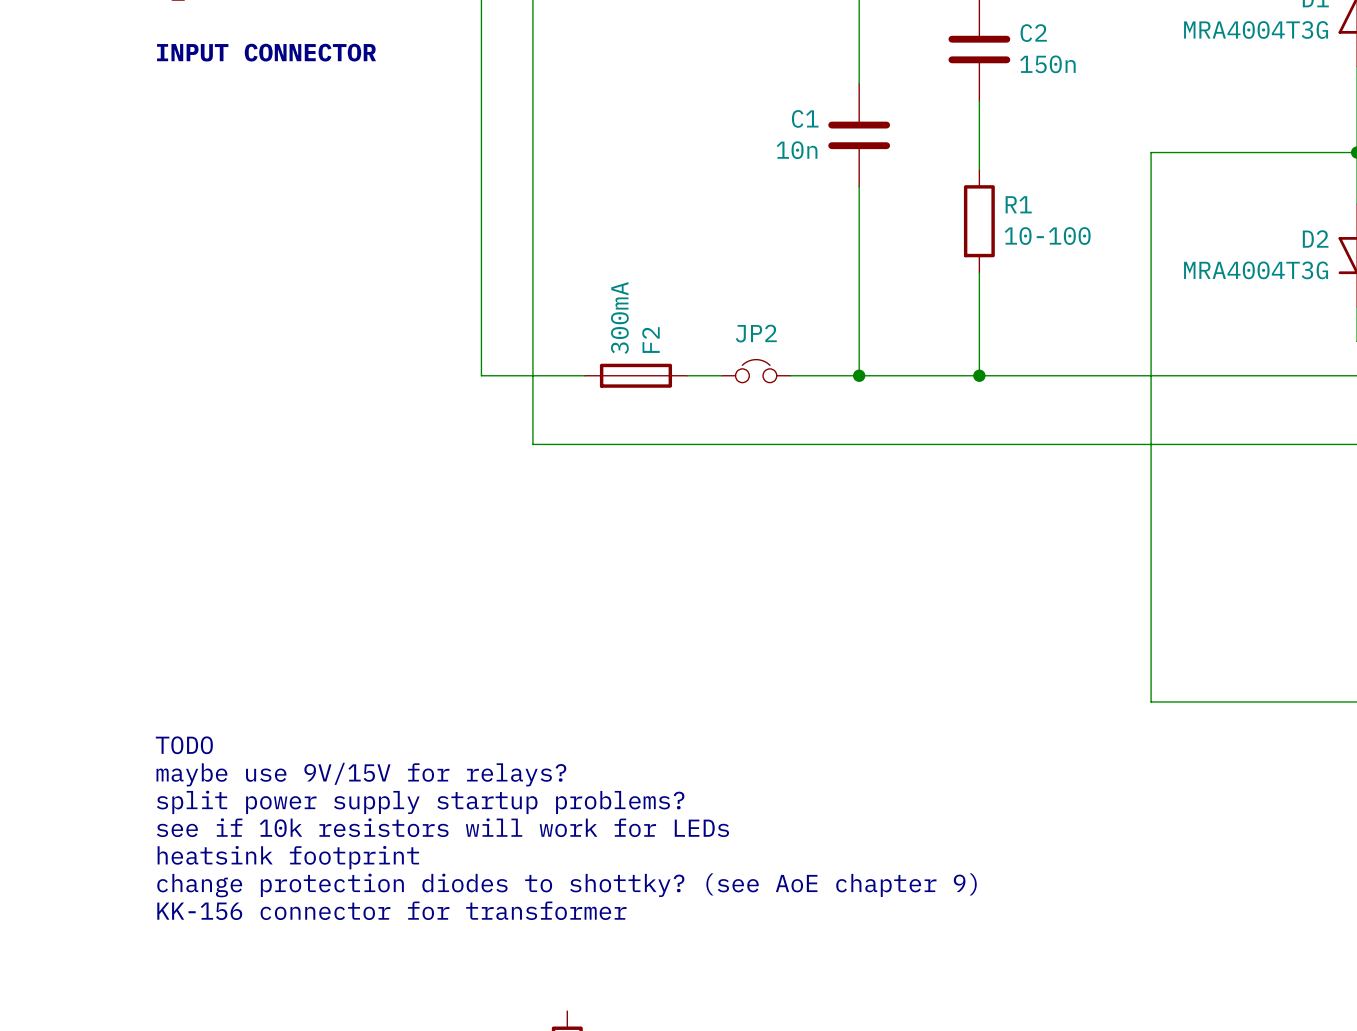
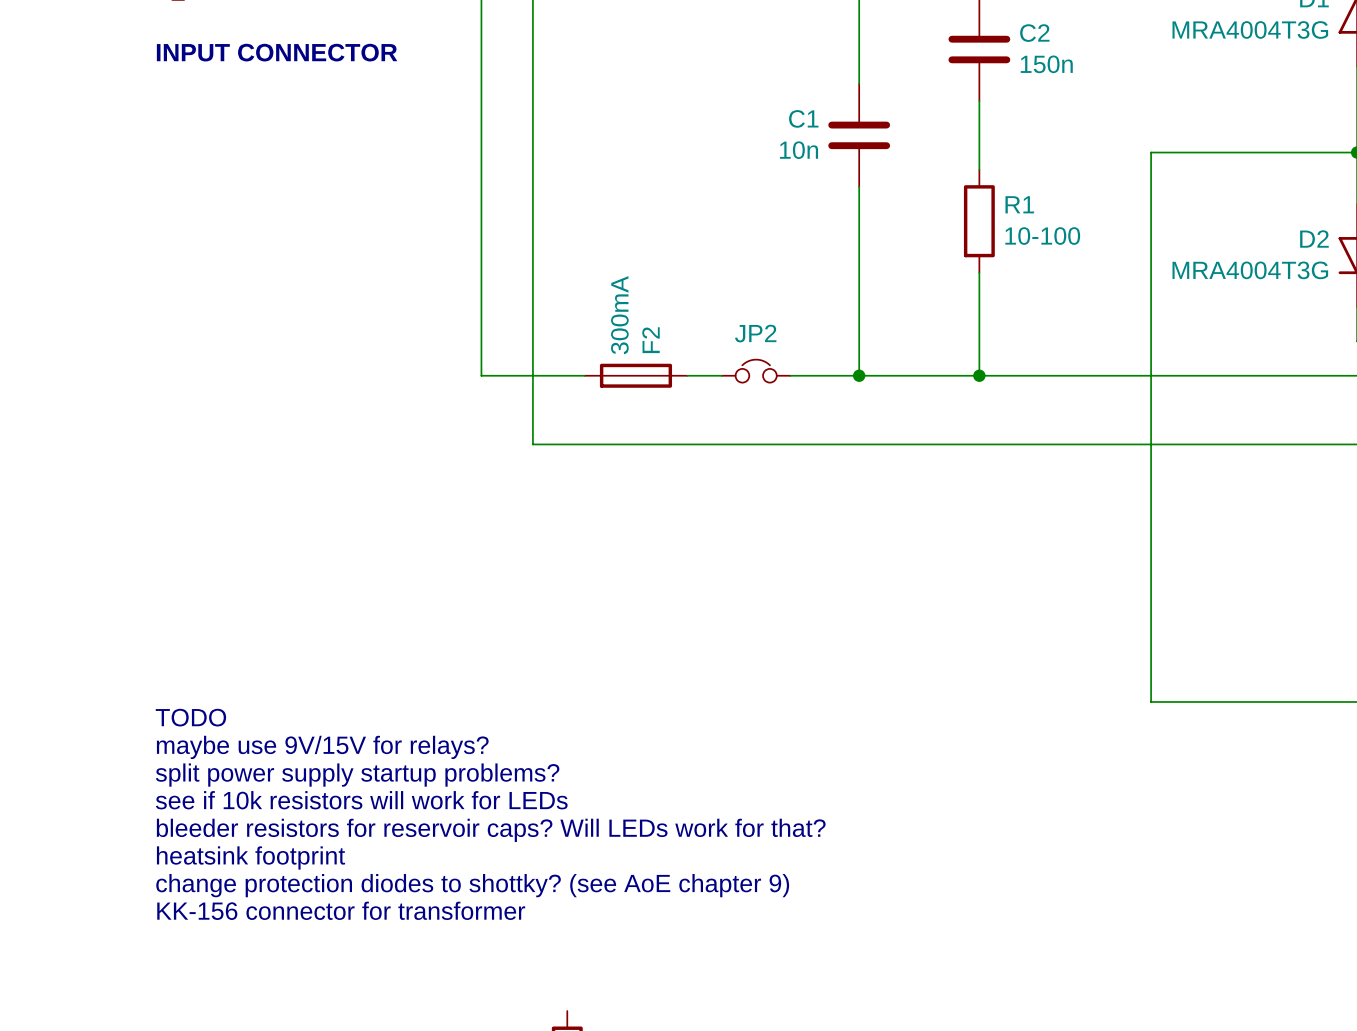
text: none -> TODO (190, 717)
text: TODO (184, 745) -> maybe use 9V/15V for relays? (322, 747)
text: maybe use 9V/15V for relays? (361, 774) -> split power supply startup problems? (357, 775)
text: split power supply startup problems? (420, 802) -> see if 10k resistors will work for LEDs (361, 800)
text: see if 10k resistors will work for LEDs (442, 827) -> bleeder resistors for reservoir caps? Will LEDs work for that? (491, 830)

